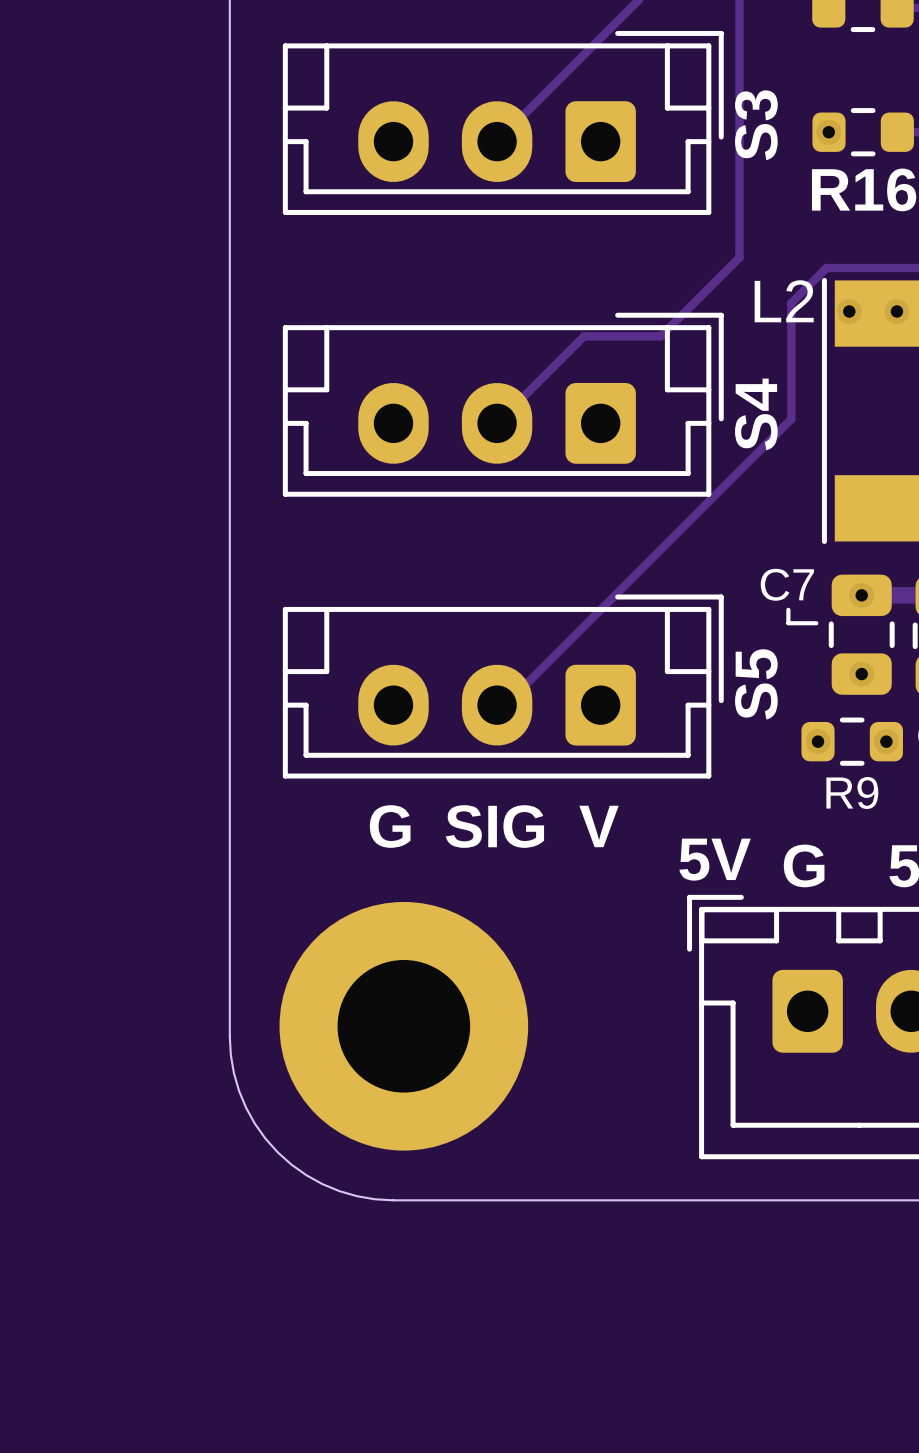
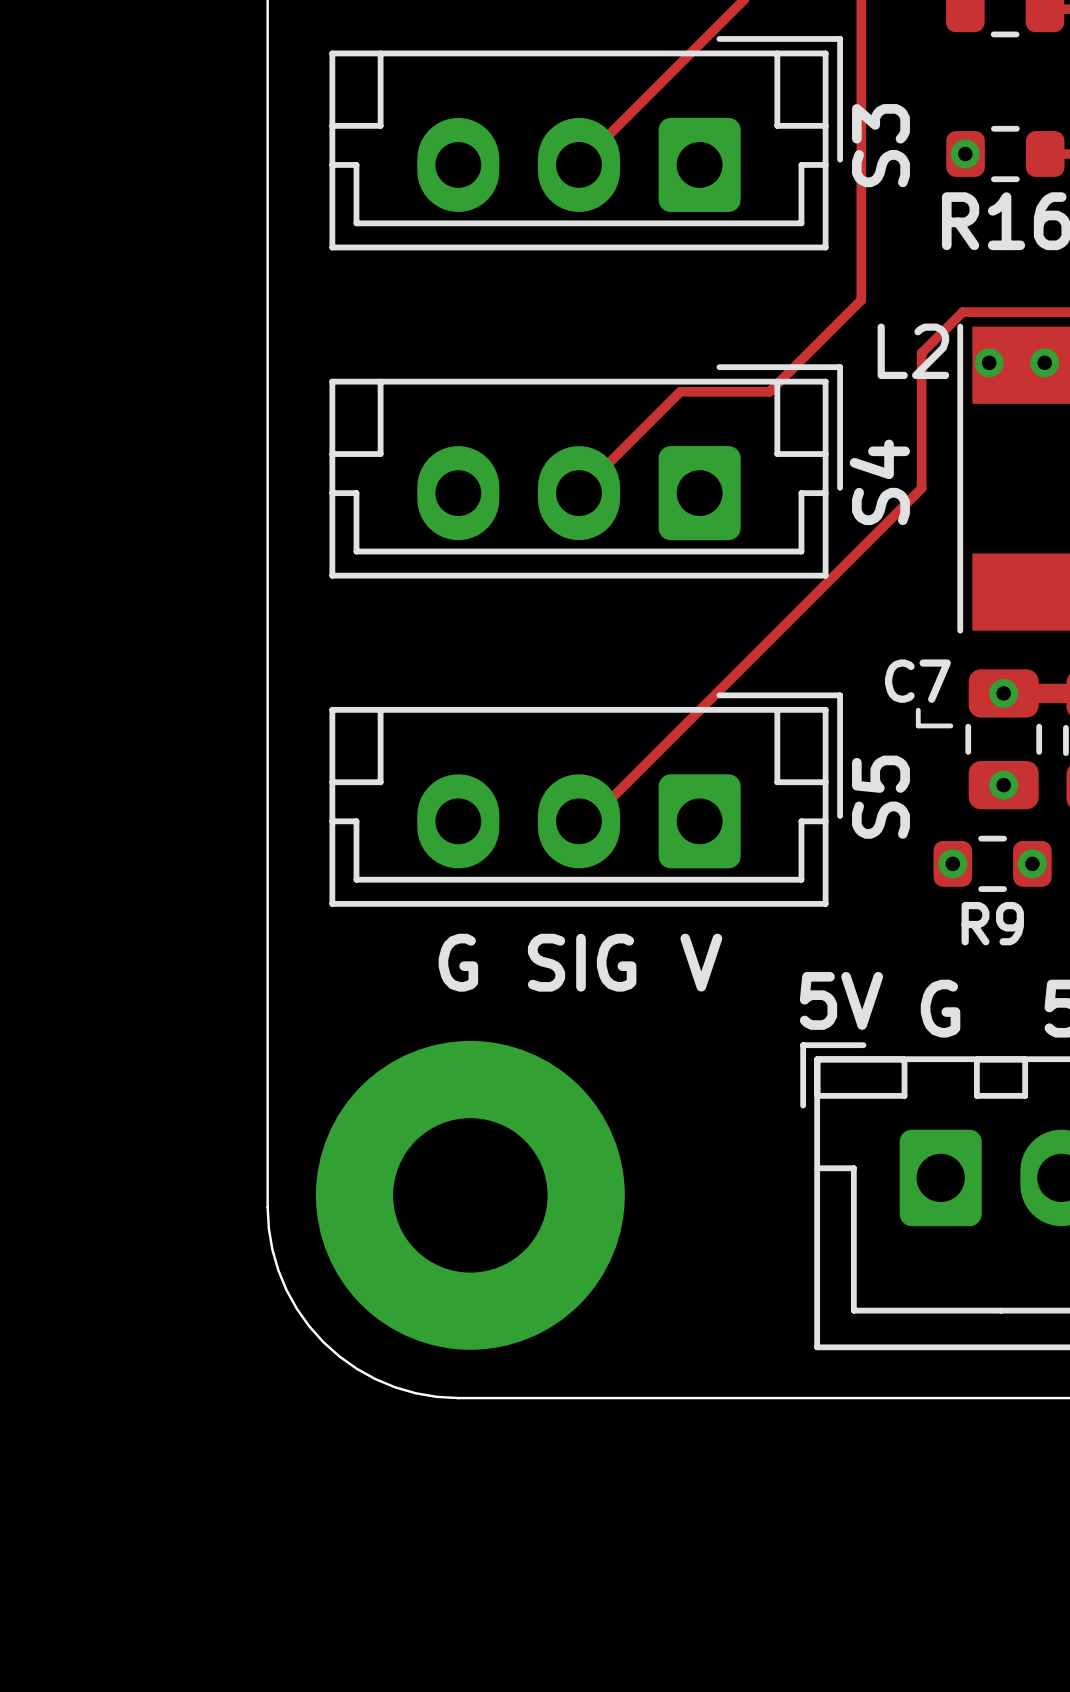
part footprint: [279, 901, 529, 1151] -> [315, 1040, 625, 1350]

